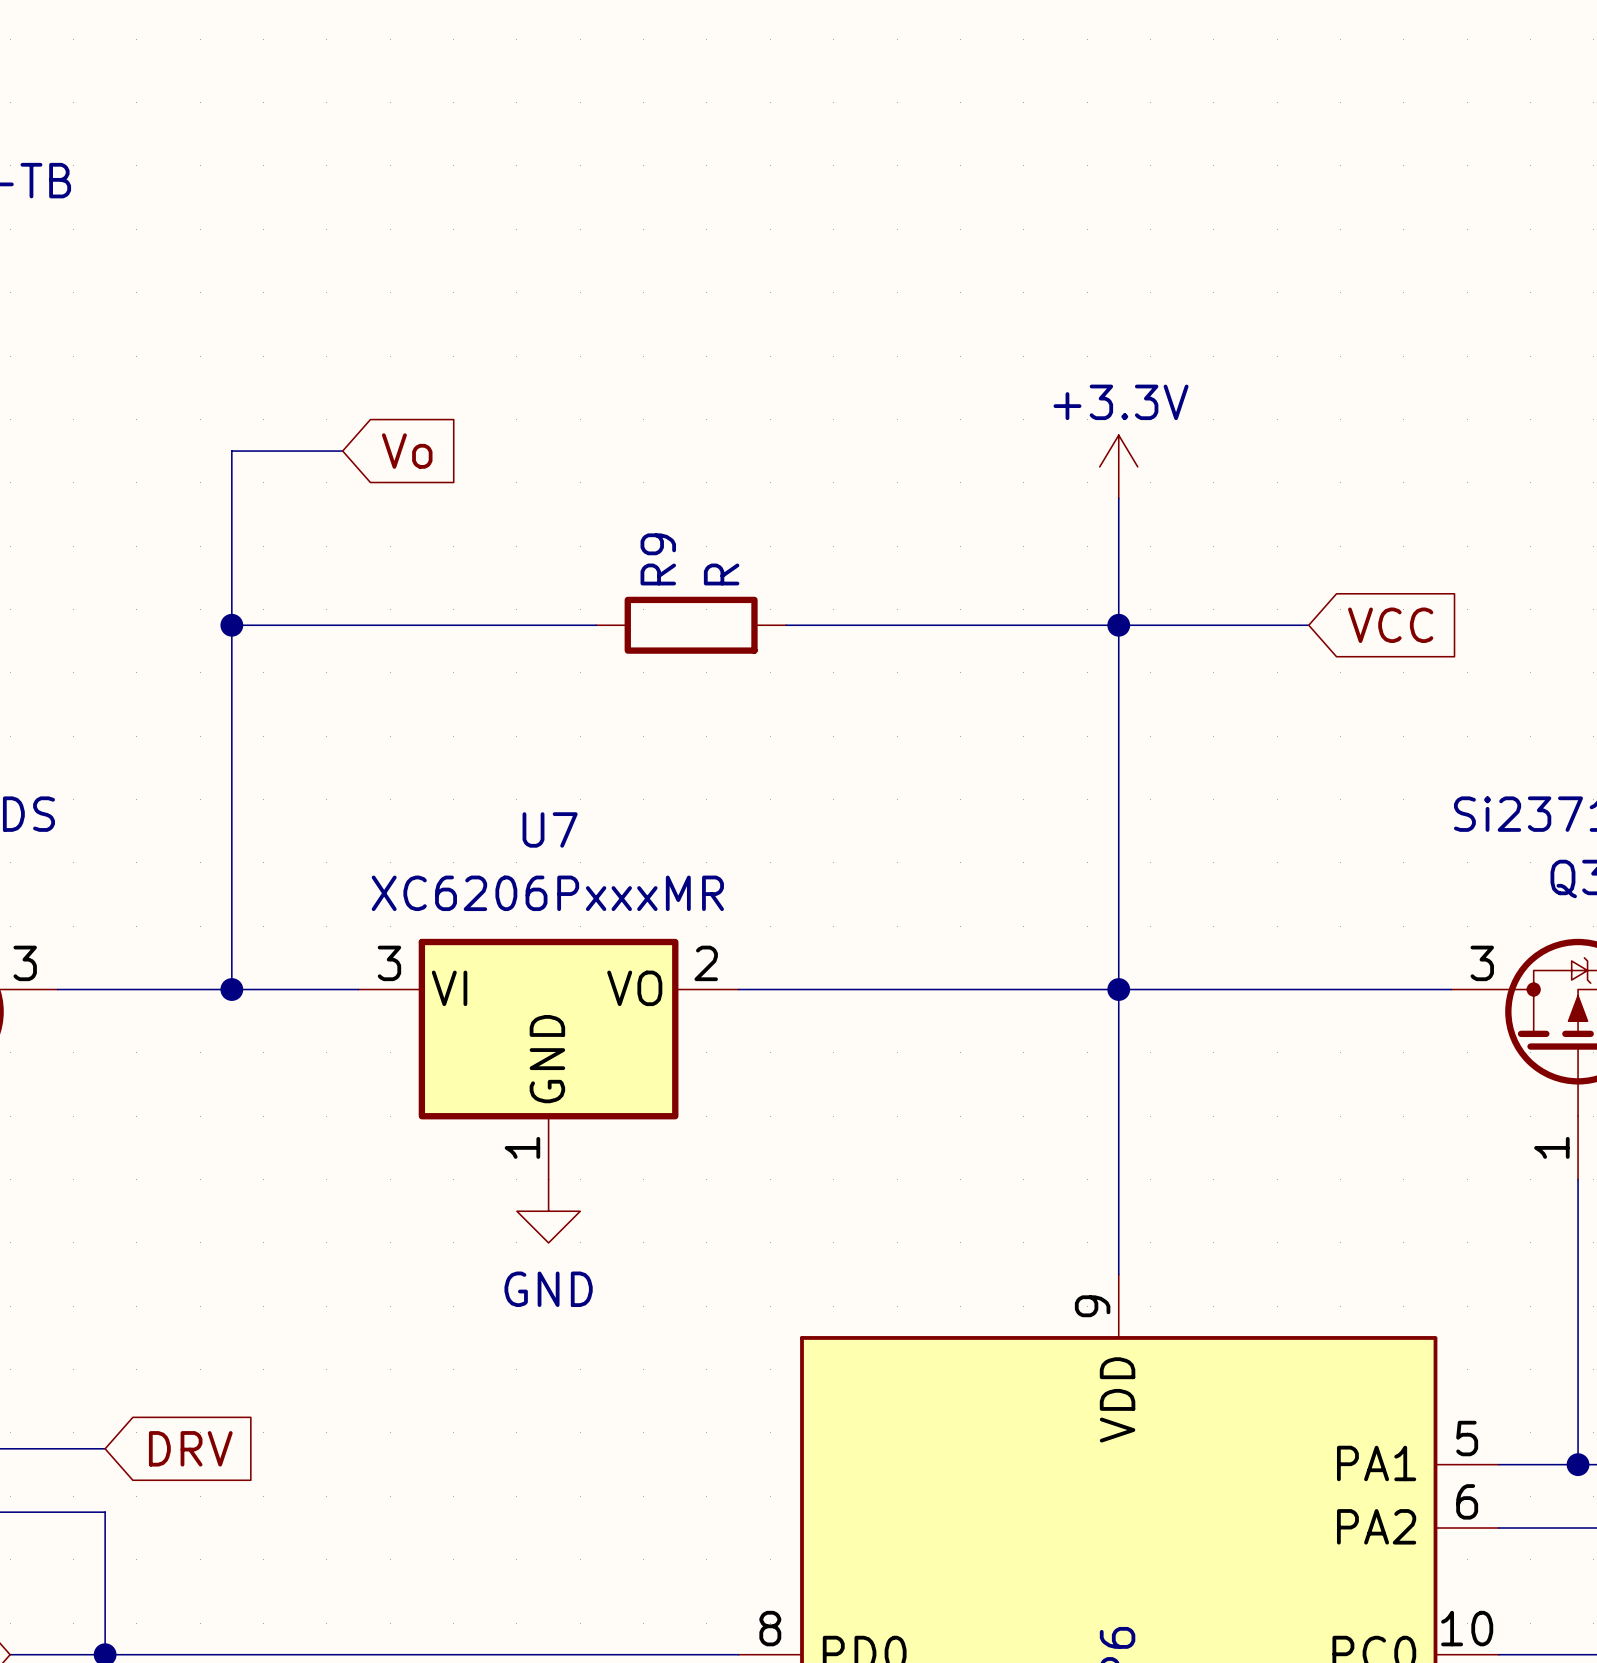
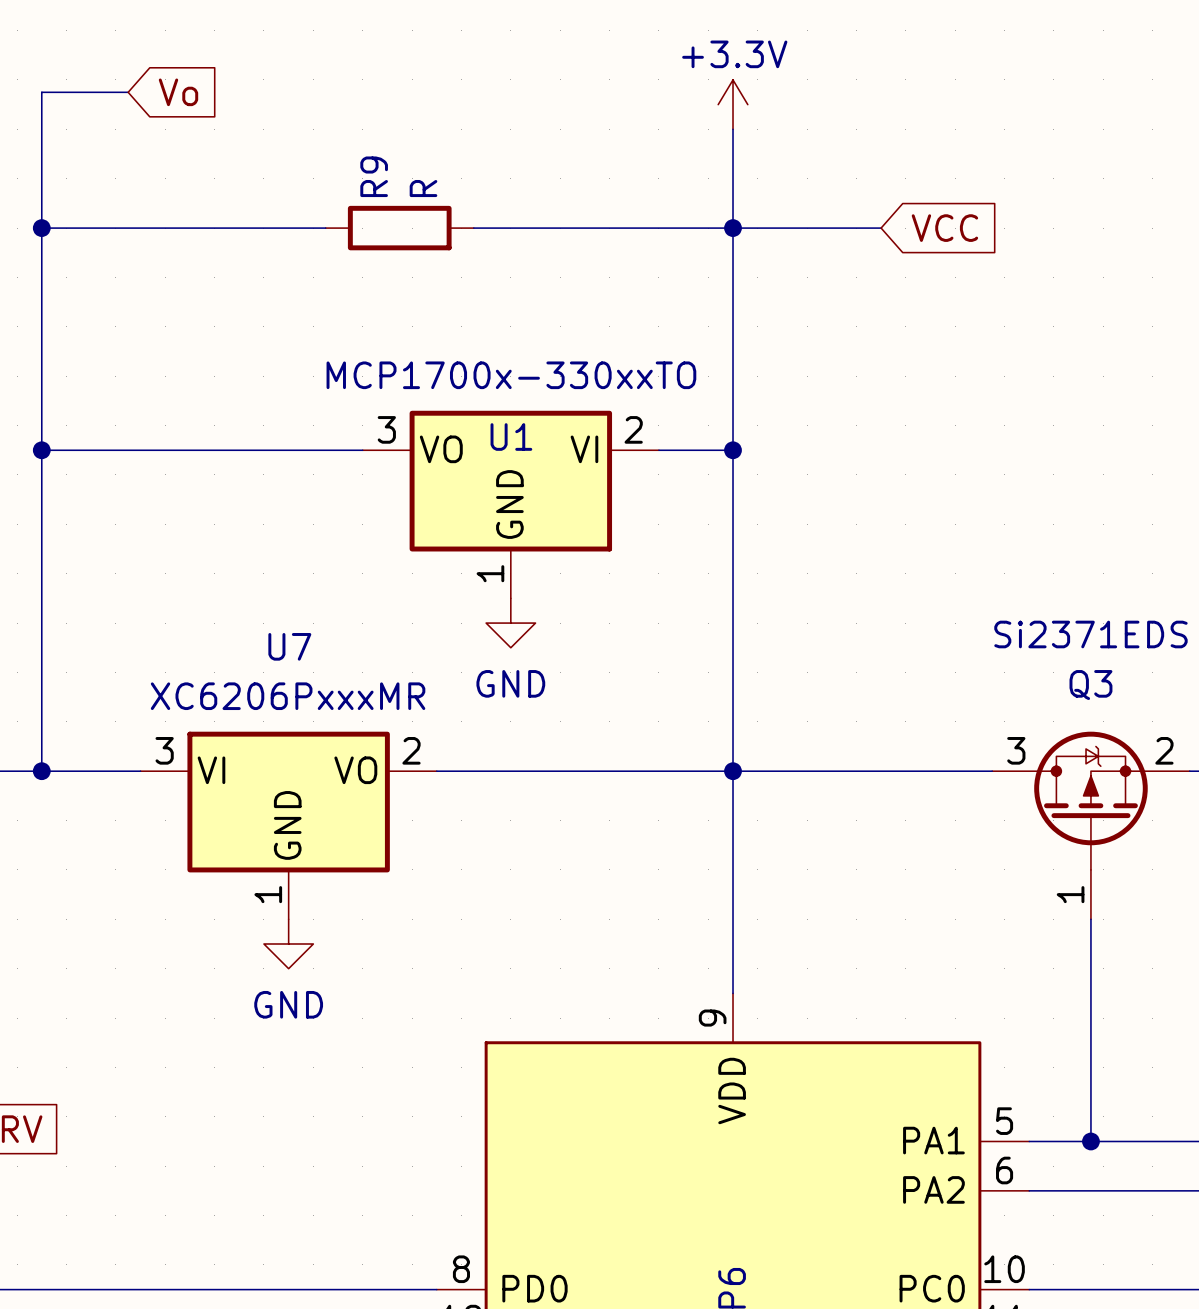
wire: none -> (733, 129) (733, 388)
junction: none -> (41, 228)
junction: none -> (733, 228)
wire: (231, 451) (342, 451) -> (41, 351) (41, 92) (128, 92)
global label position: Vo (407, 451) -> Vo (178, 92)
power symbol position: +3.3V (1118, 466) -> +3.3V (733, 104)
wire: none -> (41, 450) (362, 450)
wire: none -> (658, 450) (733, 450)
wire: (231, 625) (596, 625) -> (41, 228) (325, 228)
junction position: (231, 625) -> (41, 450)
R9 position: (691, 625) -> (399, 228)
wire: (786, 625) (1308, 625) -> (473, 228) (881, 228)
junction position: (1118, 625) -> (733, 450)
global label position: VCC (1390, 625) -> VCC (944, 228)
U1: none -> MCP1700x-330xxTO (510, 504)
power symbol: none -> GND (510, 623)

